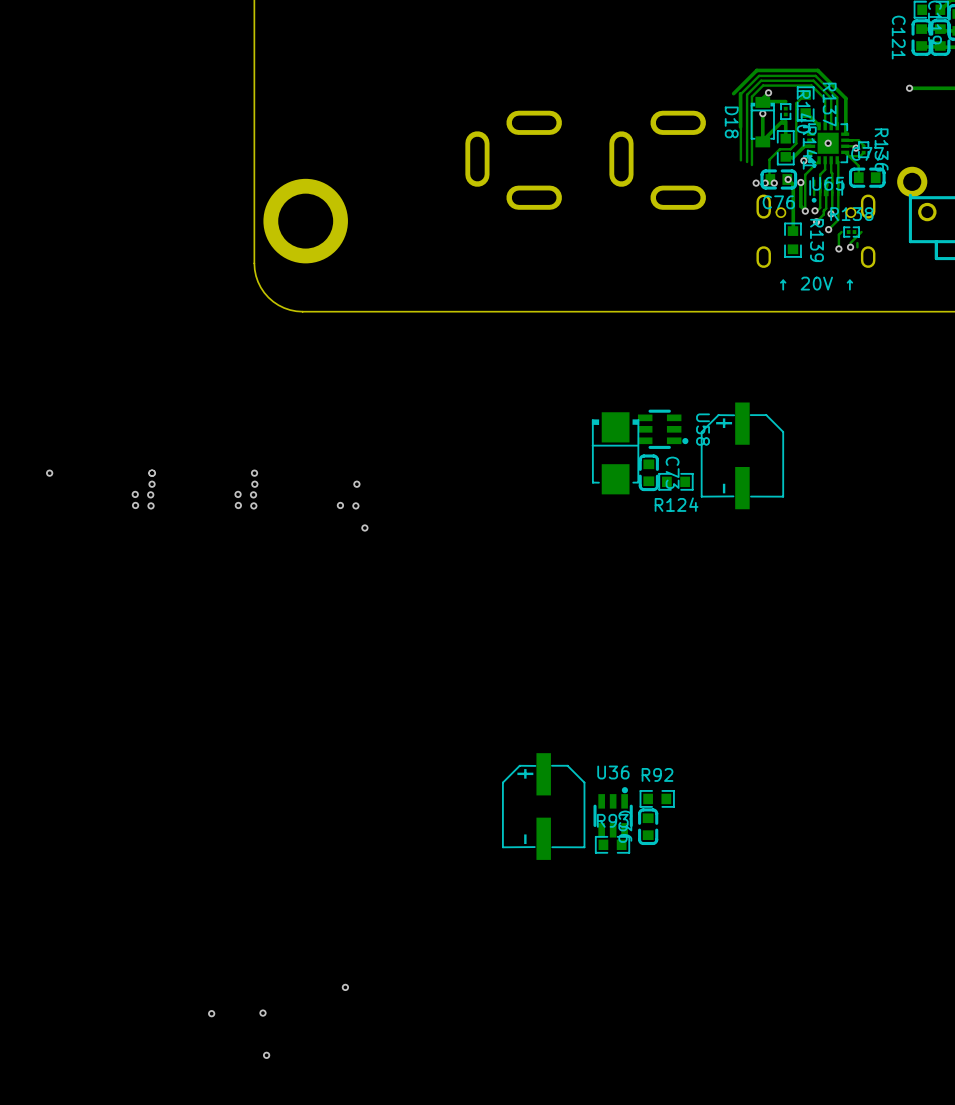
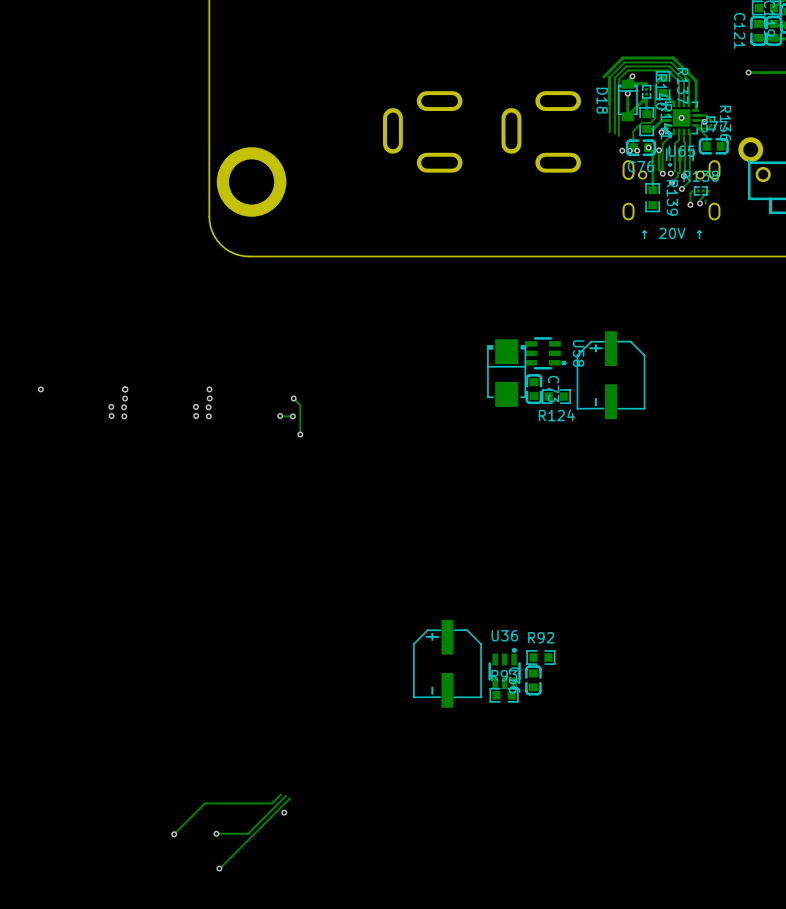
track: none -> (293, 398) (300, 405) (300, 434)
track: none -> (280, 416) (292, 416)
track: none -> (280, 794) (272, 803) (205, 803) (174, 834)
track: none -> (286, 796) (248, 833) (216, 833)
track: none -> (289, 798) (219, 868)

